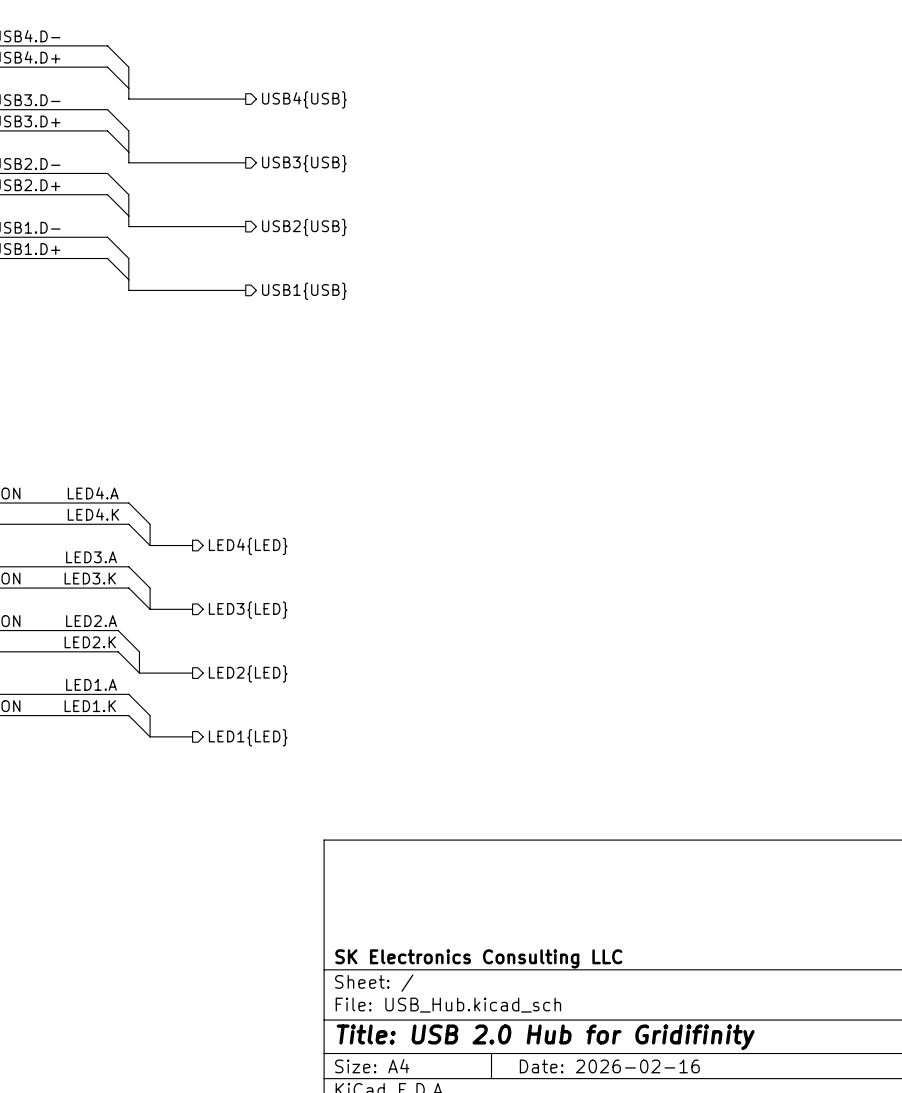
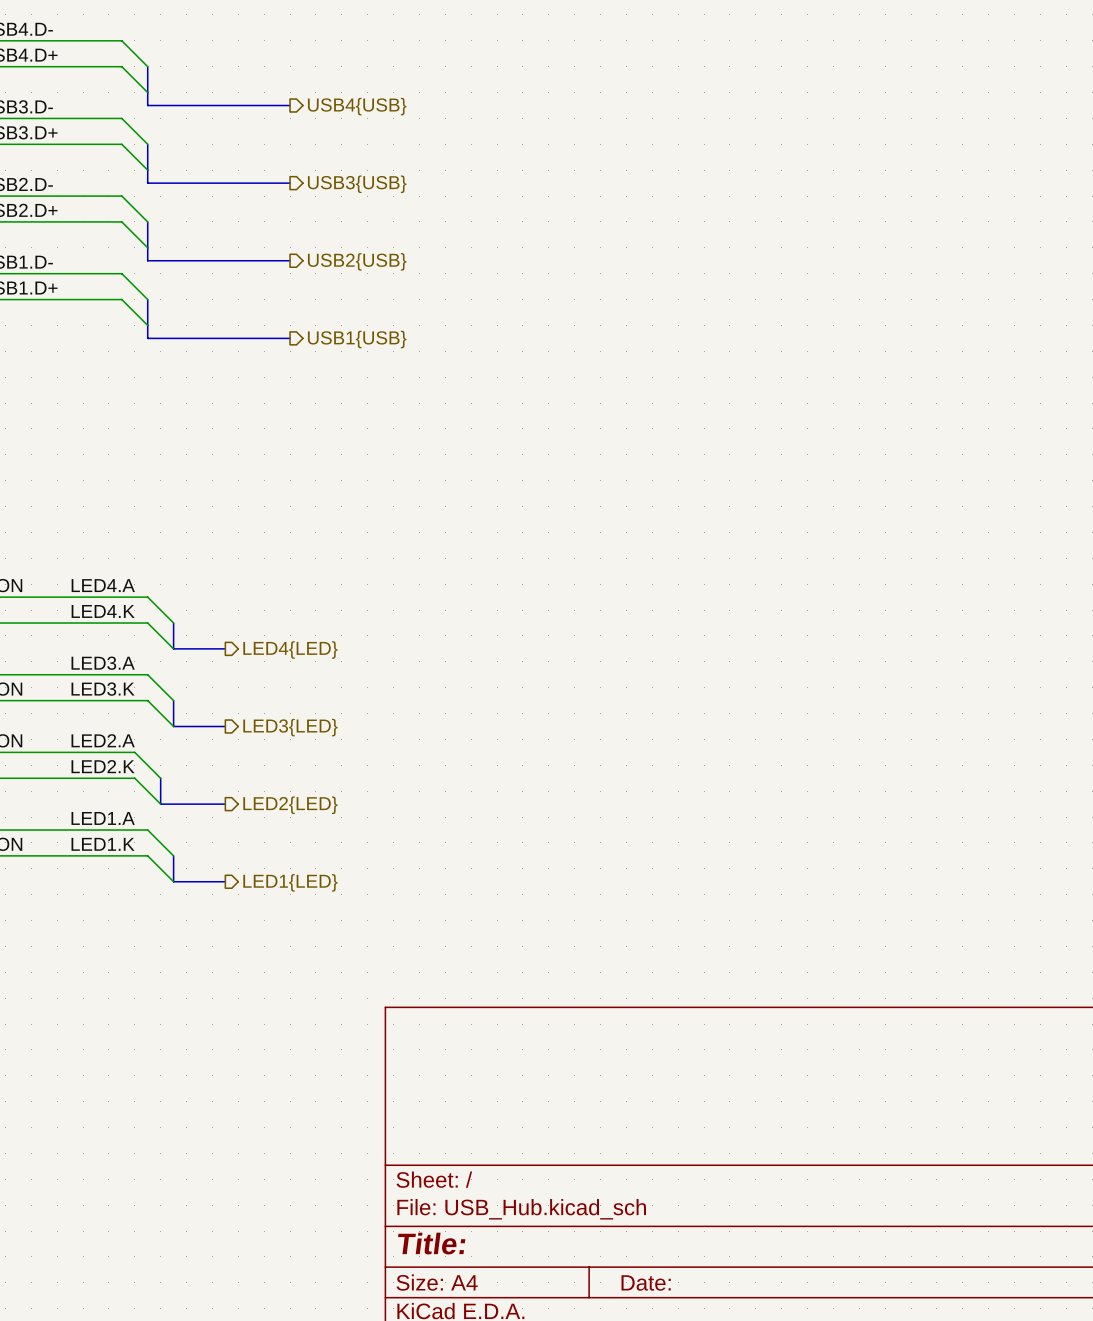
title block: SK Electronics Consulting LLC (478, 958) -> none
title block: Title: USB 2.0 Hub for Gridifinity (545, 1037) -> Title: (431, 1243)
title block: Date: 2026-02-16 (609, 1066) -> Date: (646, 1282)

